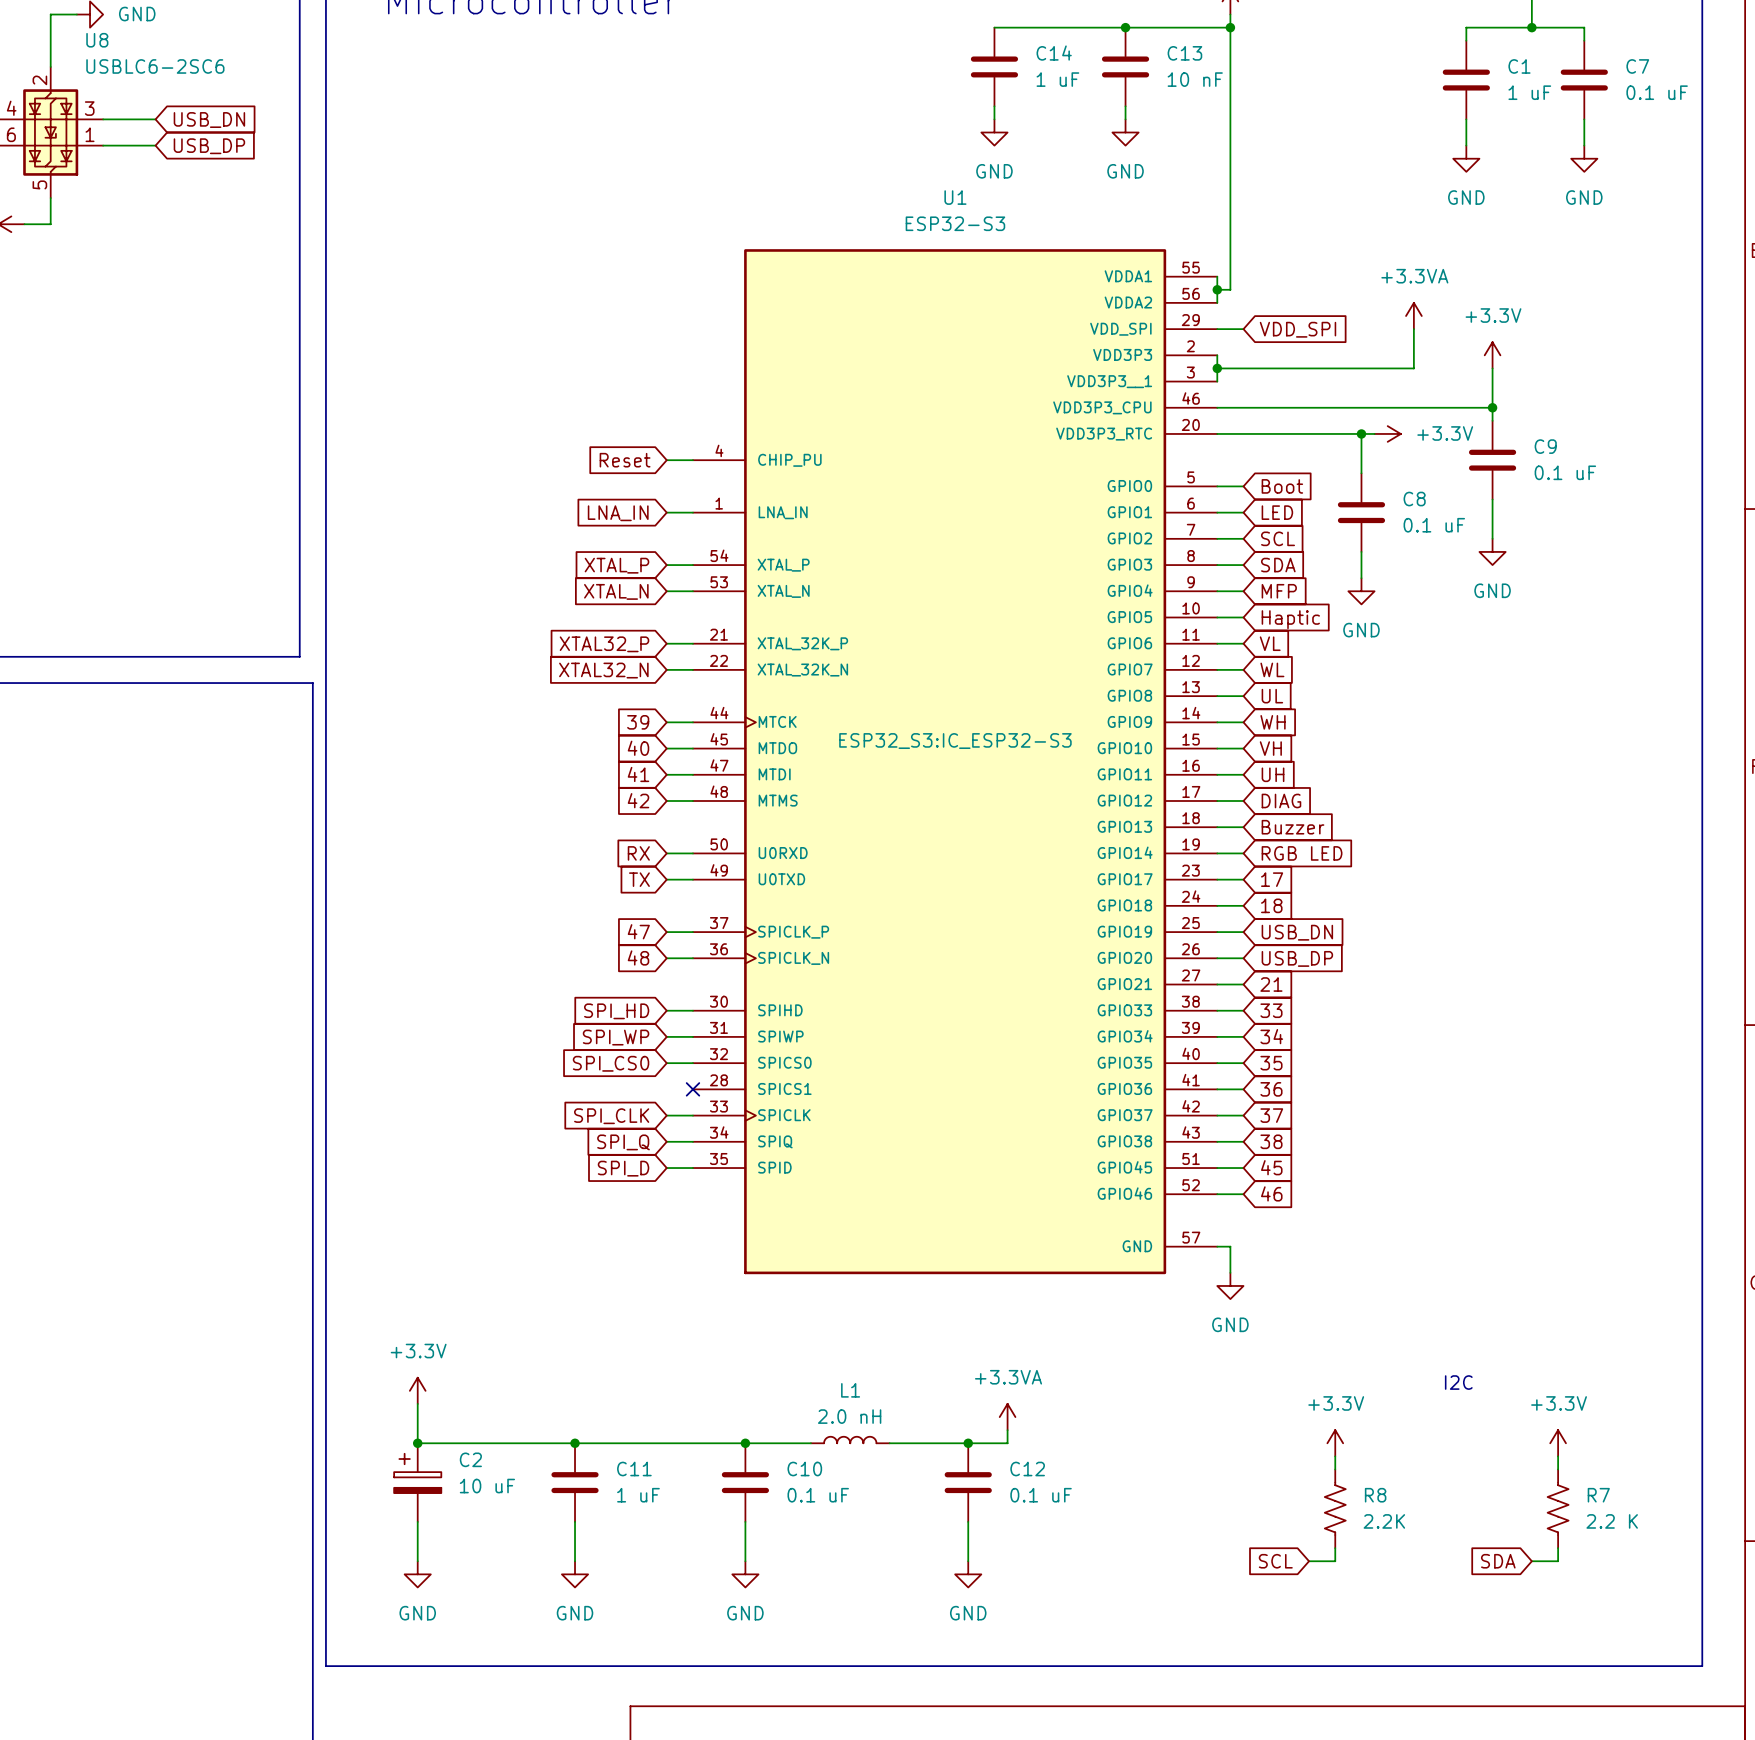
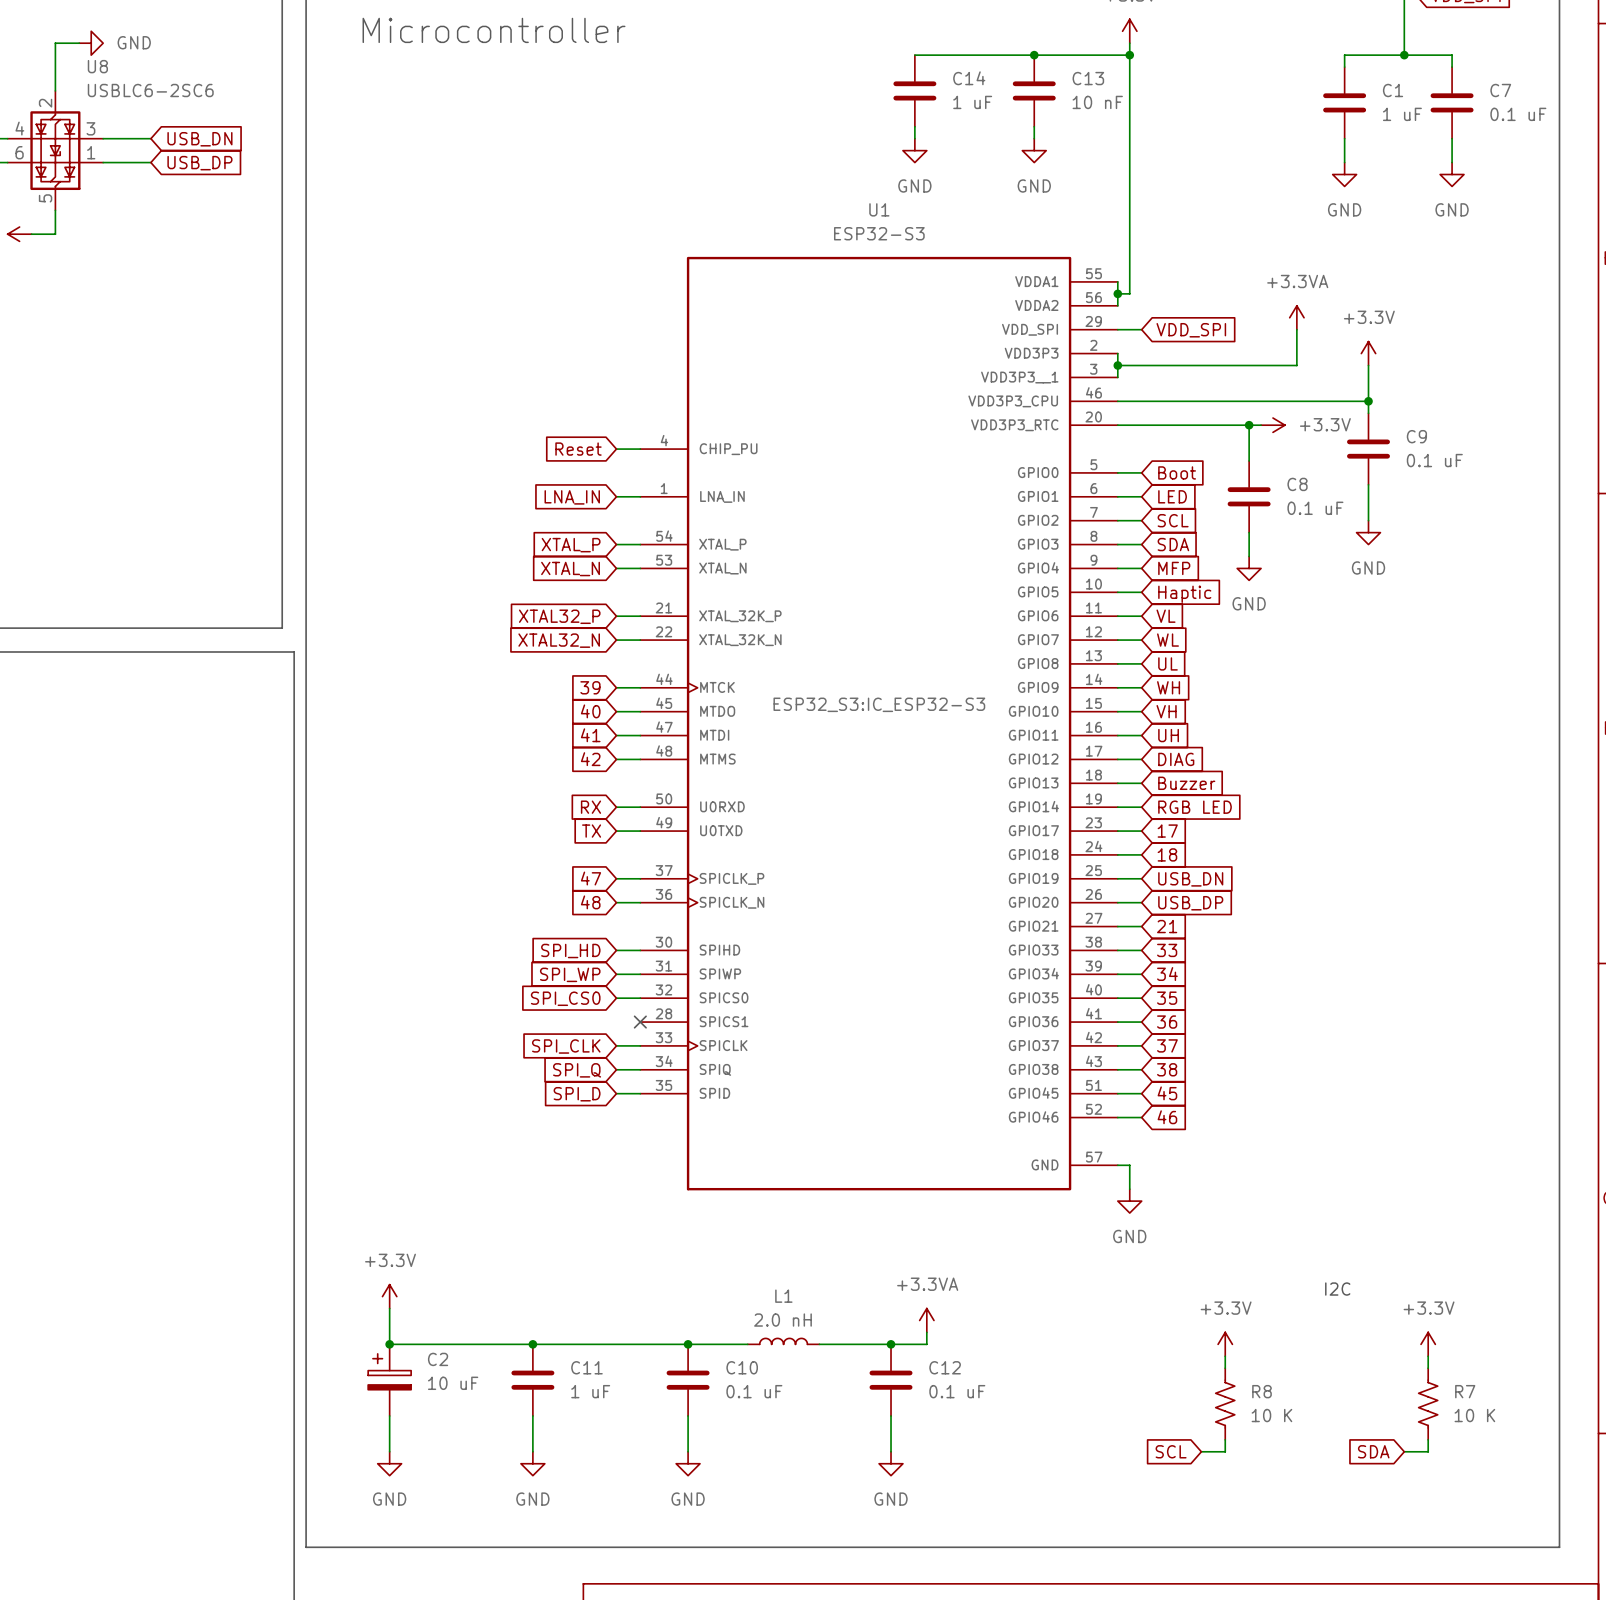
R8 value: 2.2K (1384, 1521) -> 10 K (1271, 1415)
R7 value: 2.2 K (1612, 1521) -> 10 K (1474, 1415)

